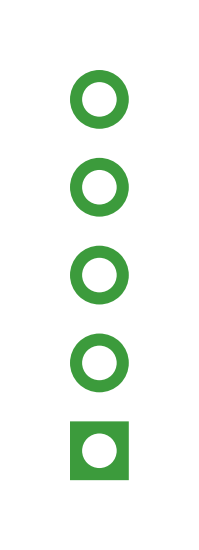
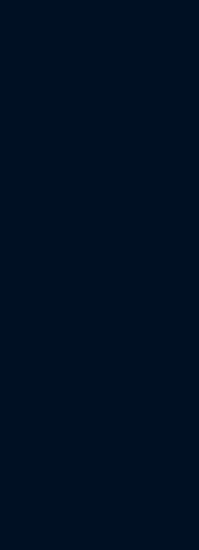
part: (99, 275) -> none

